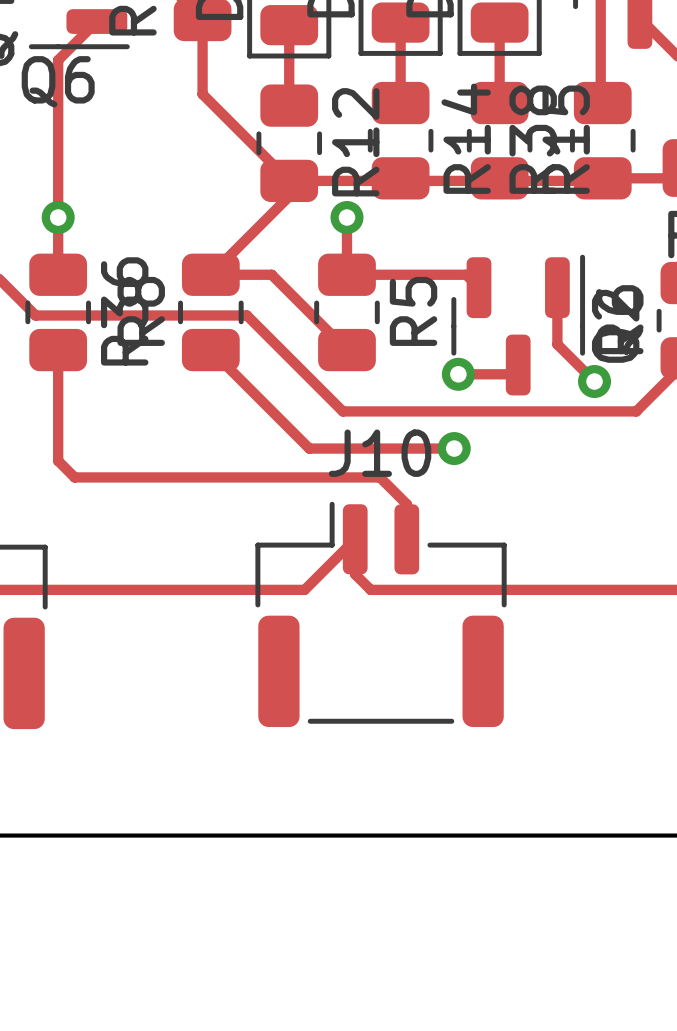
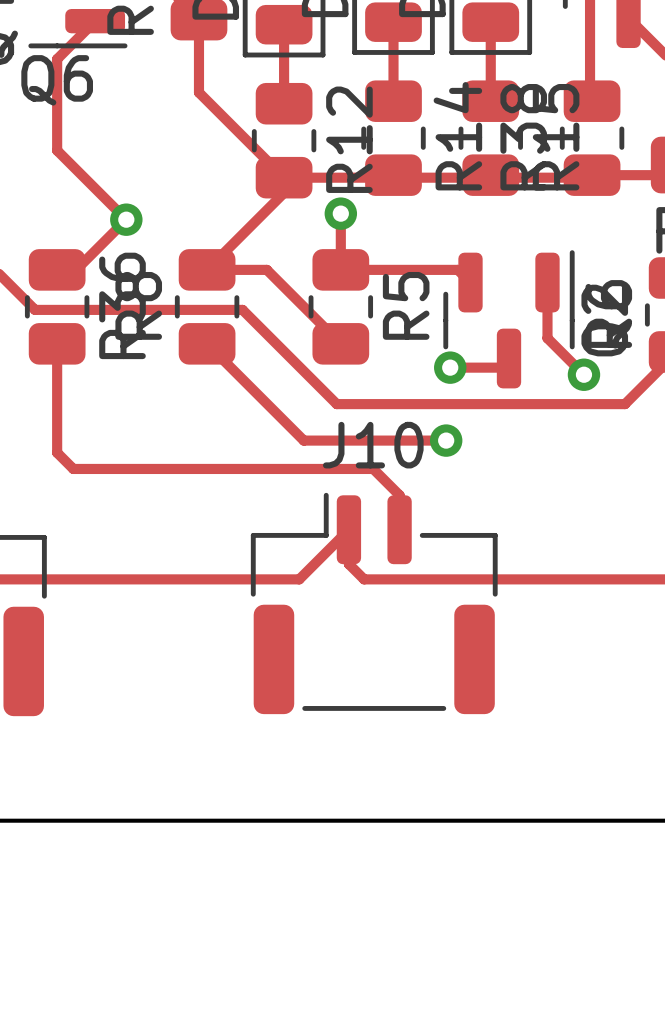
track: (58, 153) (58, 274) -> (57, 150) (126, 219) (76, 269) (57, 269)
via position: (58, 217) -> (126, 219)

